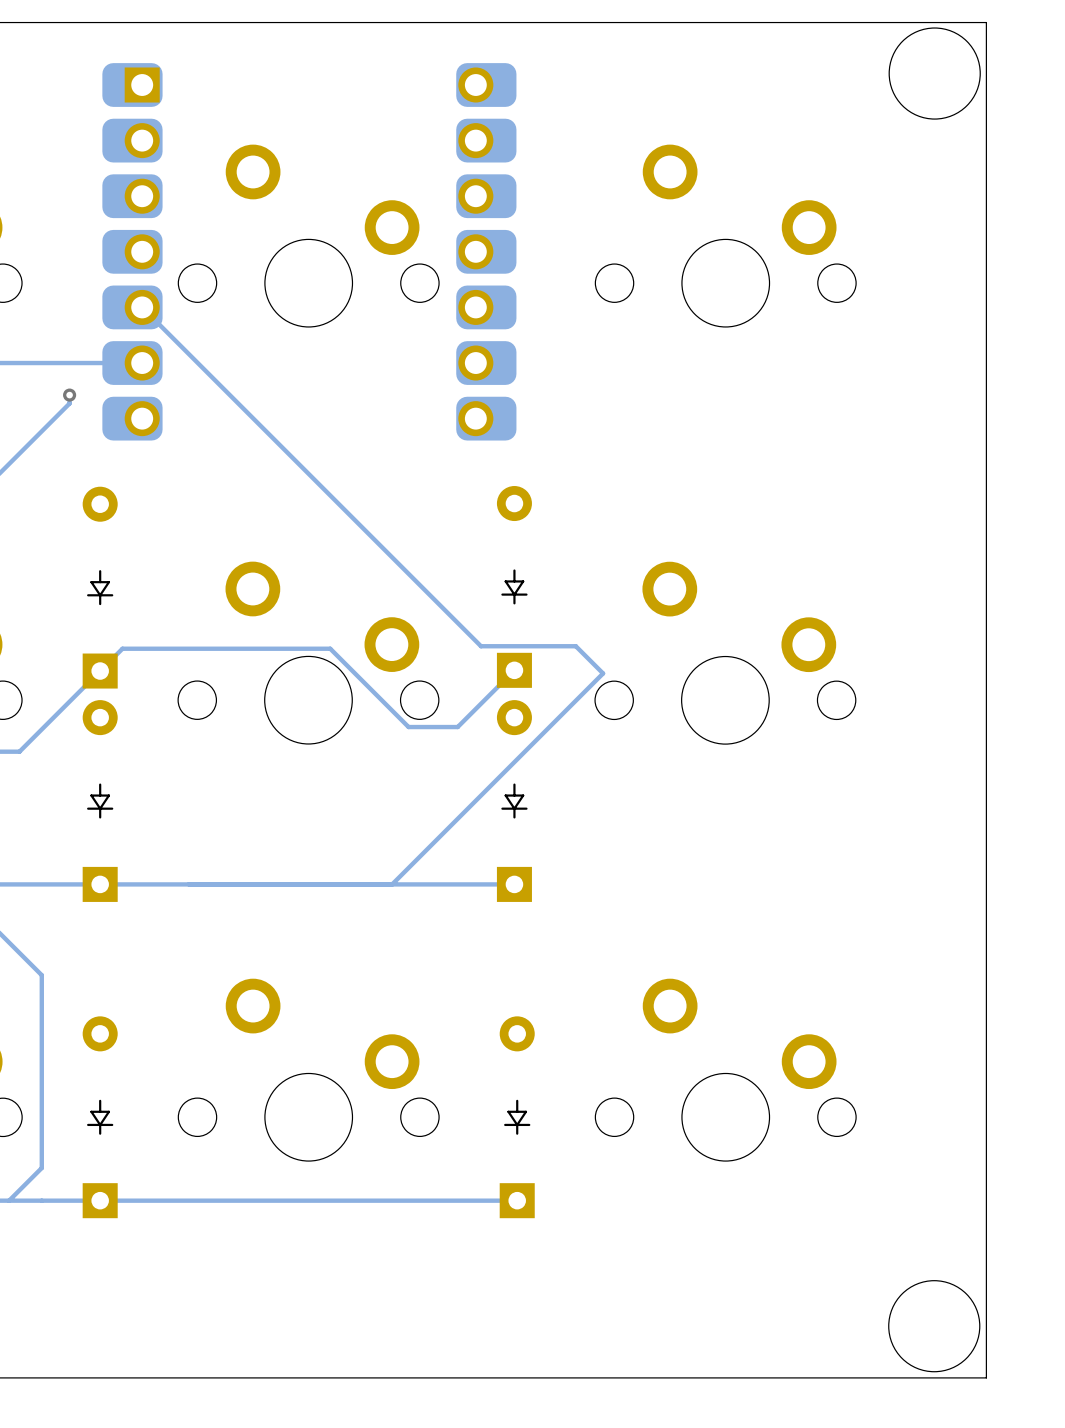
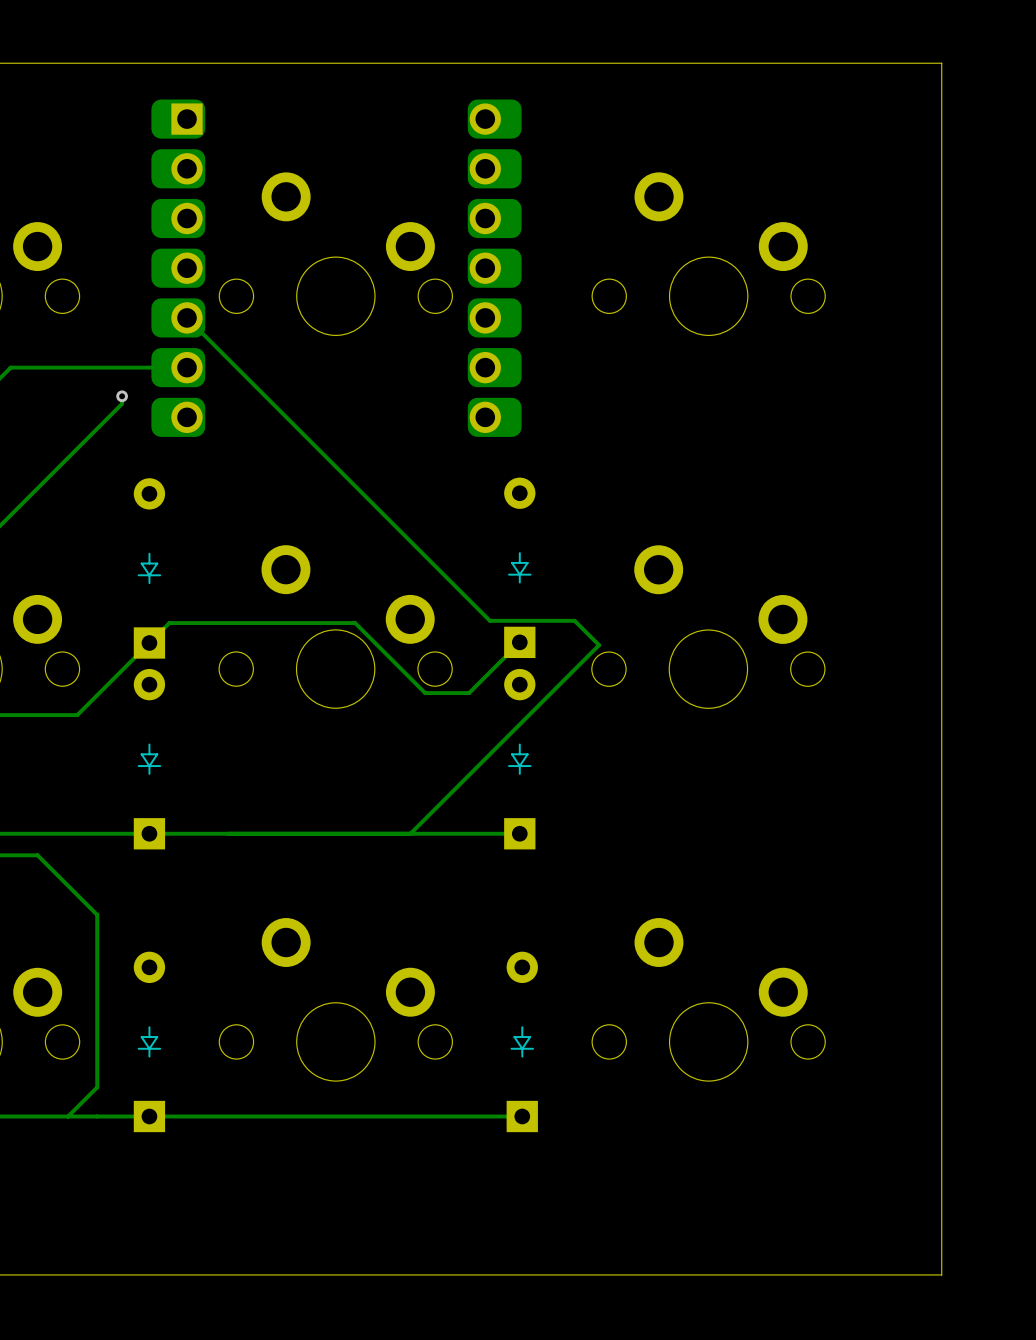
round board edge: [888, 27, 981, 120] -> none
round board edge: [888, 1280, 981, 1373] -> none

